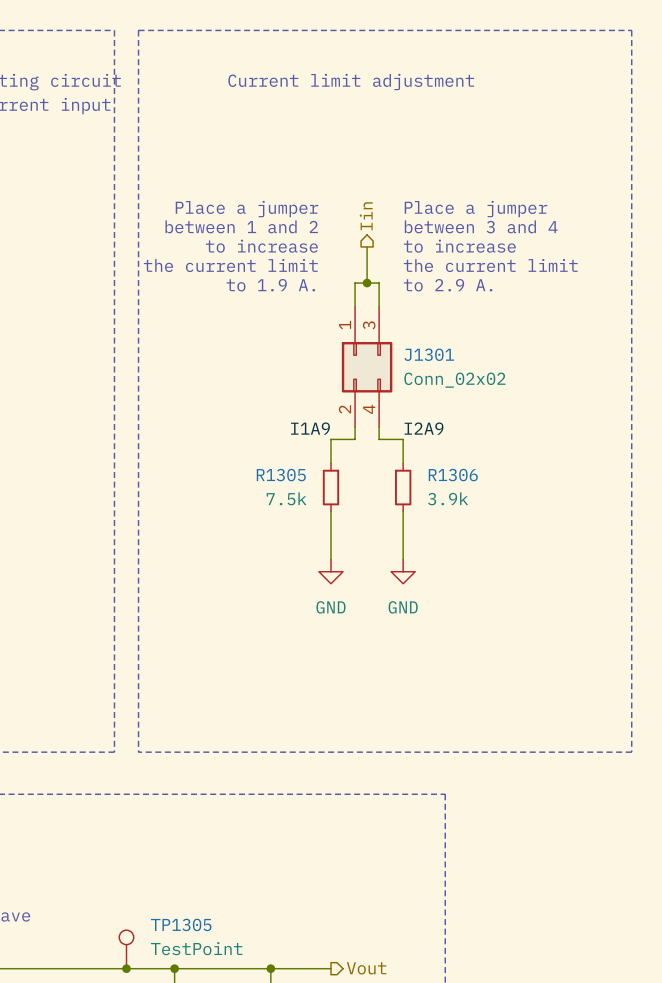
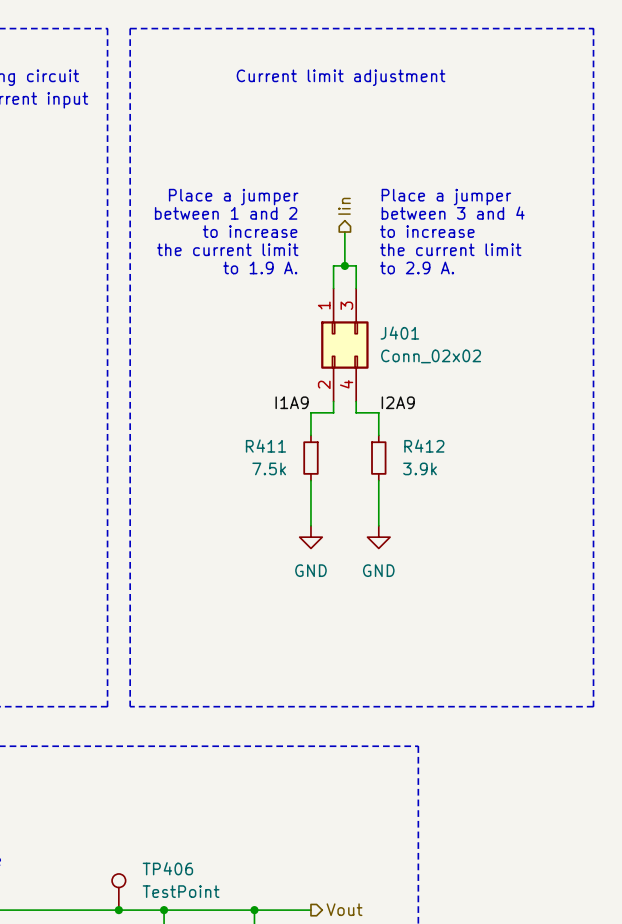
J1301 name: J1301 (429, 354) -> J401 (399, 333)
R1305 name: R1305 (281, 475) -> R411 (265, 446)
R1306 name: R1306 (453, 475) -> R412 (424, 446)
TP1305 name: TP1305 (181, 924) -> TP406 (167, 868)

